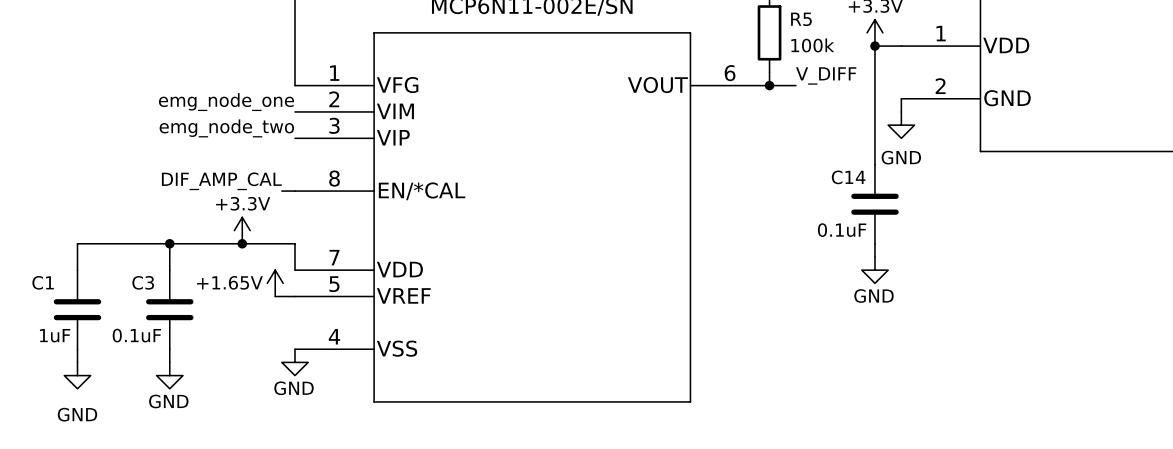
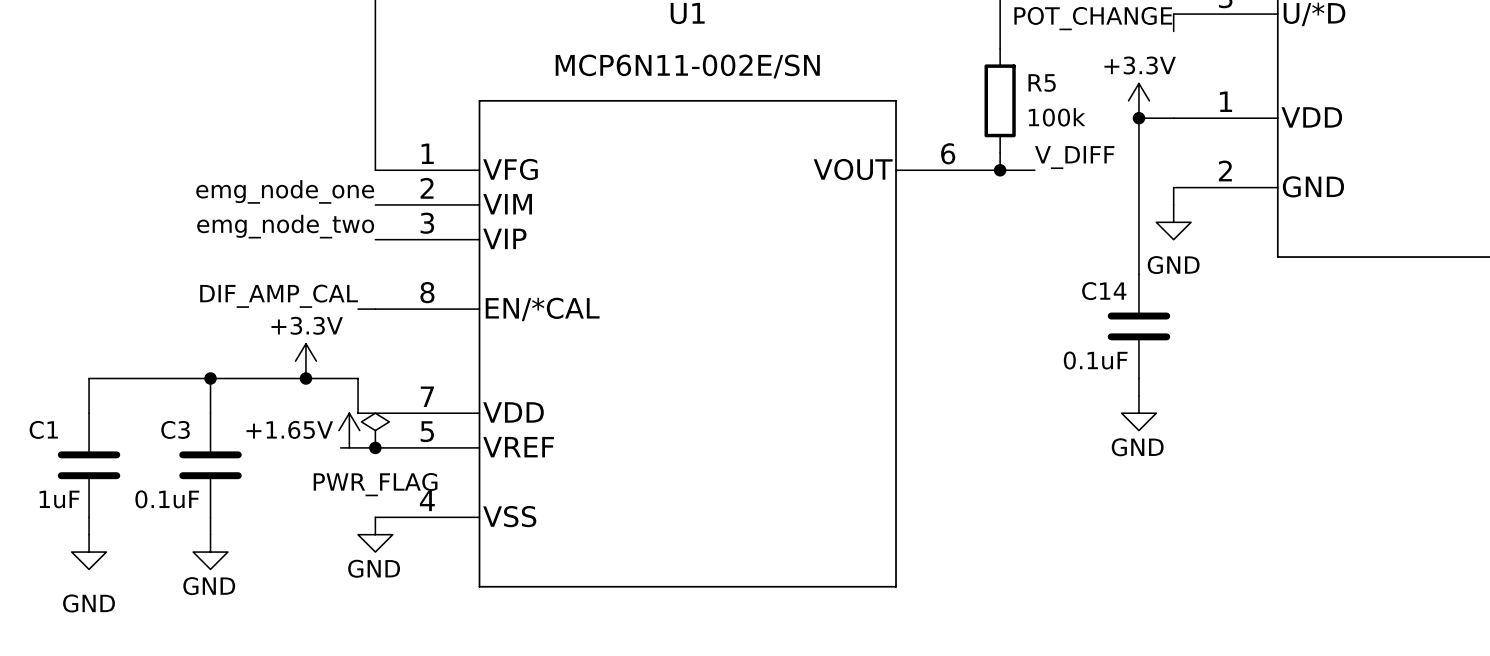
wire: (281, 243) (295, 243) (295, 270) -> (358, 378) (358, 413) (375, 413)
power symbol: none -> PWR_FLAG (375, 430)
wire: none -> (340, 447) (349, 447)
junction: none -> (375, 447)

